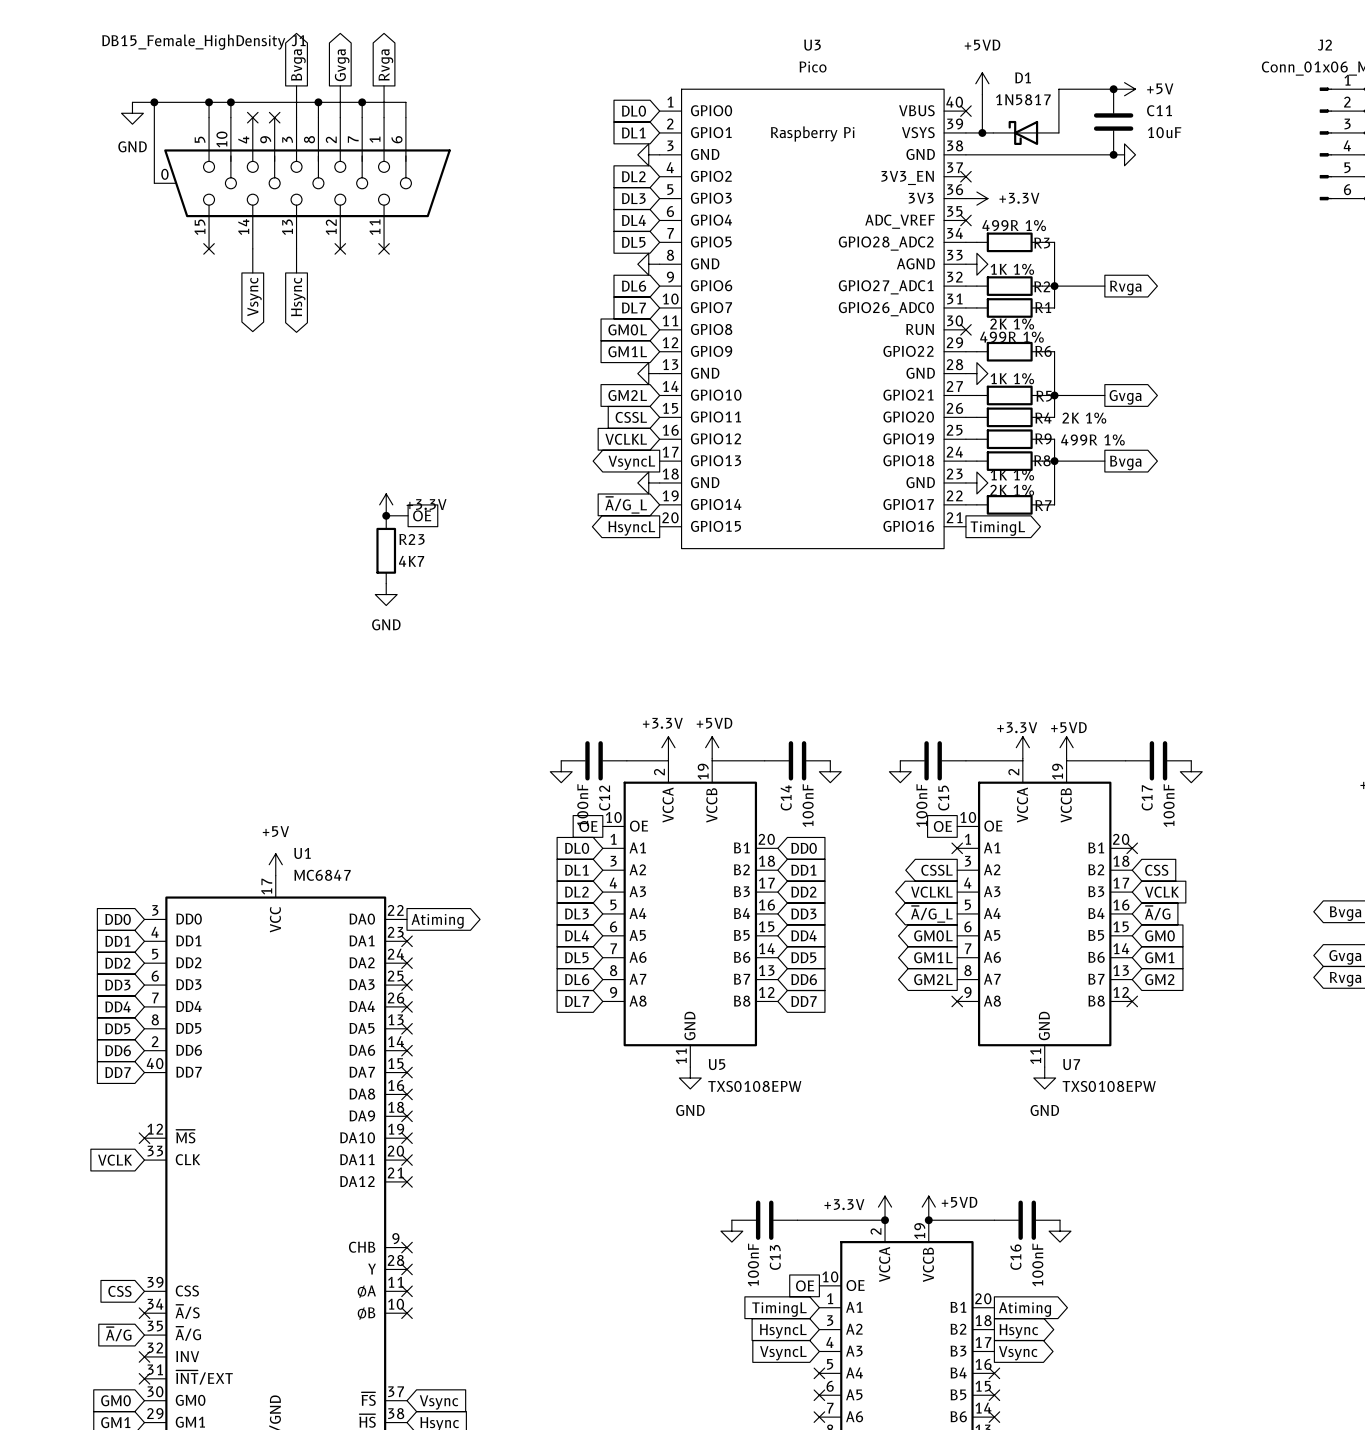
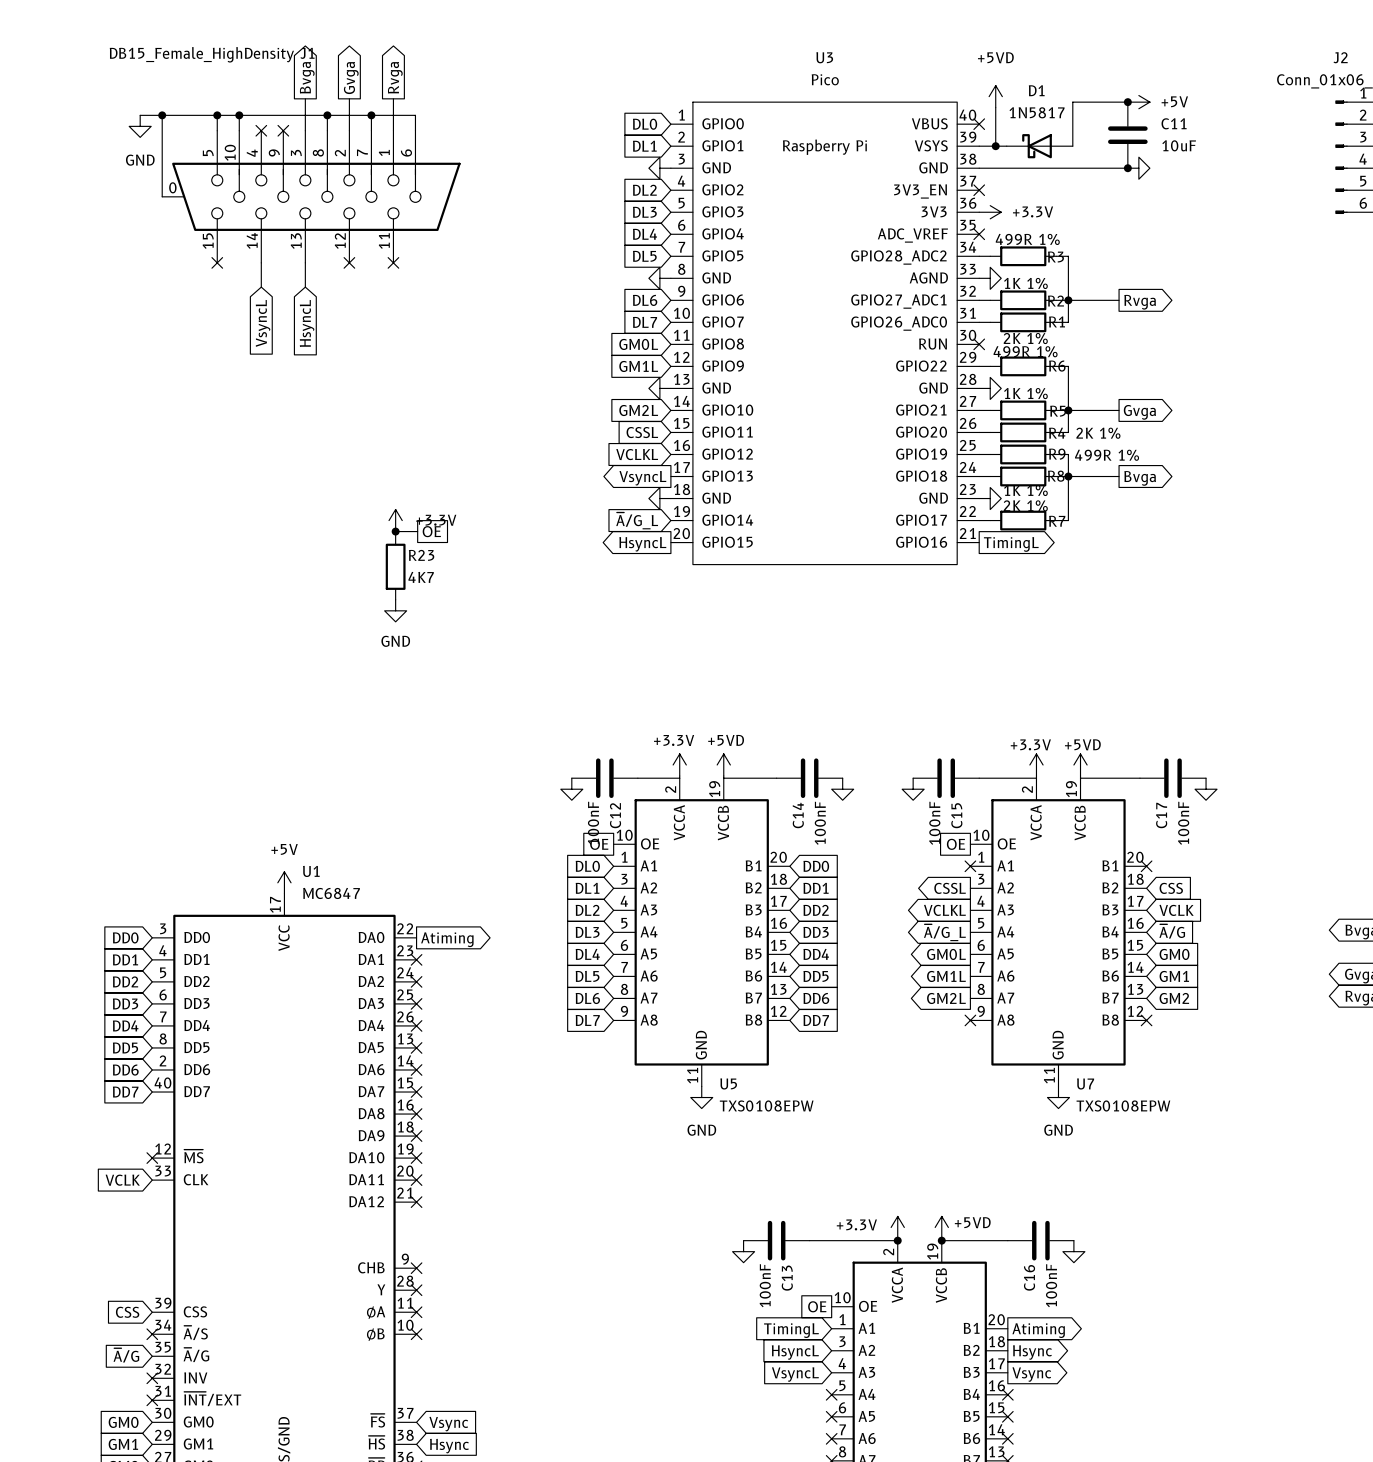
global label shape: output (254, 296) -> input (263, 323)
global label: Vsync (254, 296) -> VsyncL (263, 323)
global label shape: output (298, 297) -> input (307, 323)
global label: Hsync (298, 297) -> HsyncL (307, 323)

